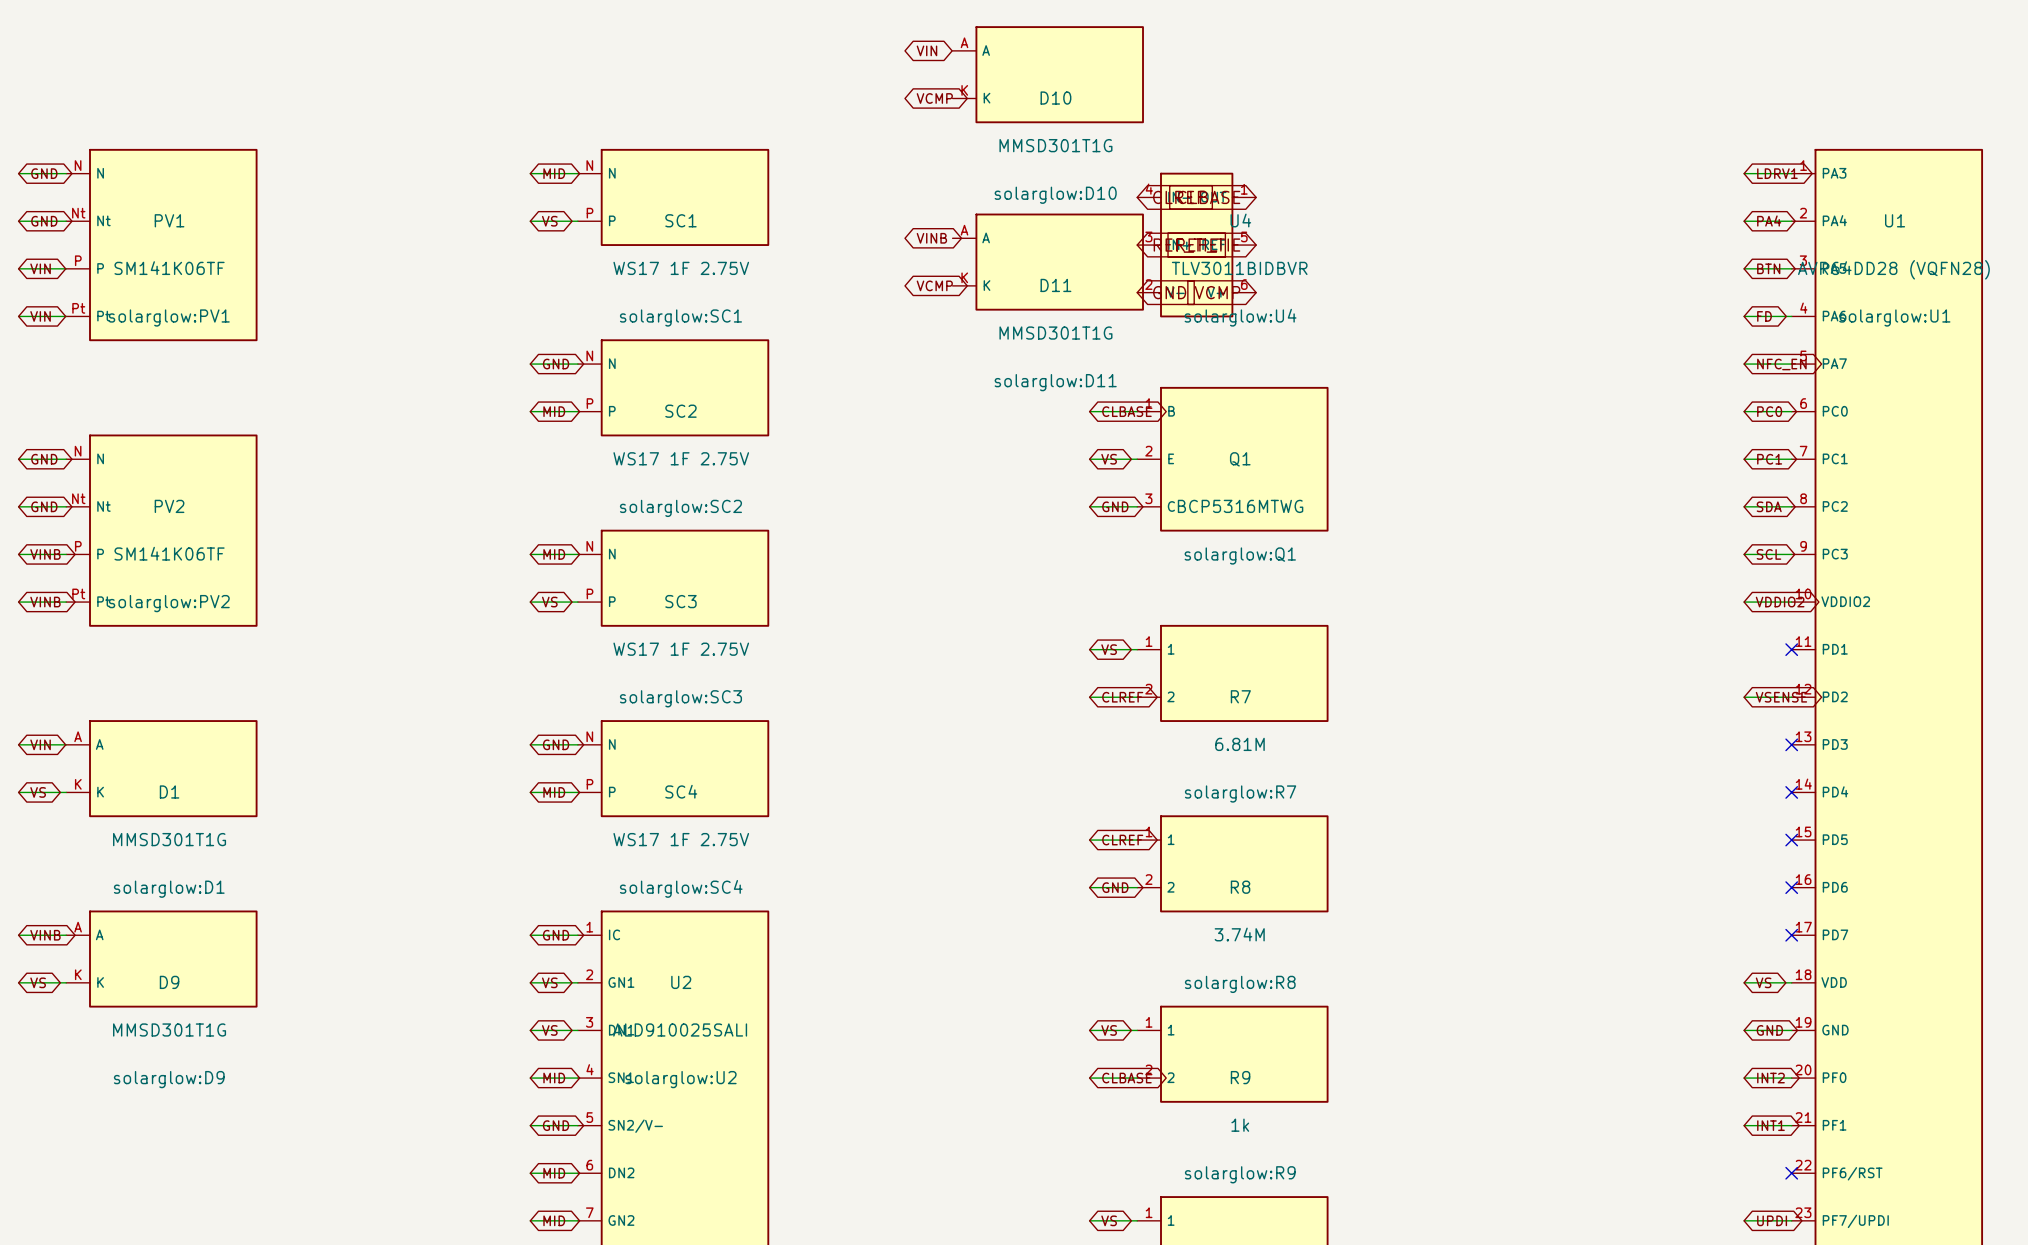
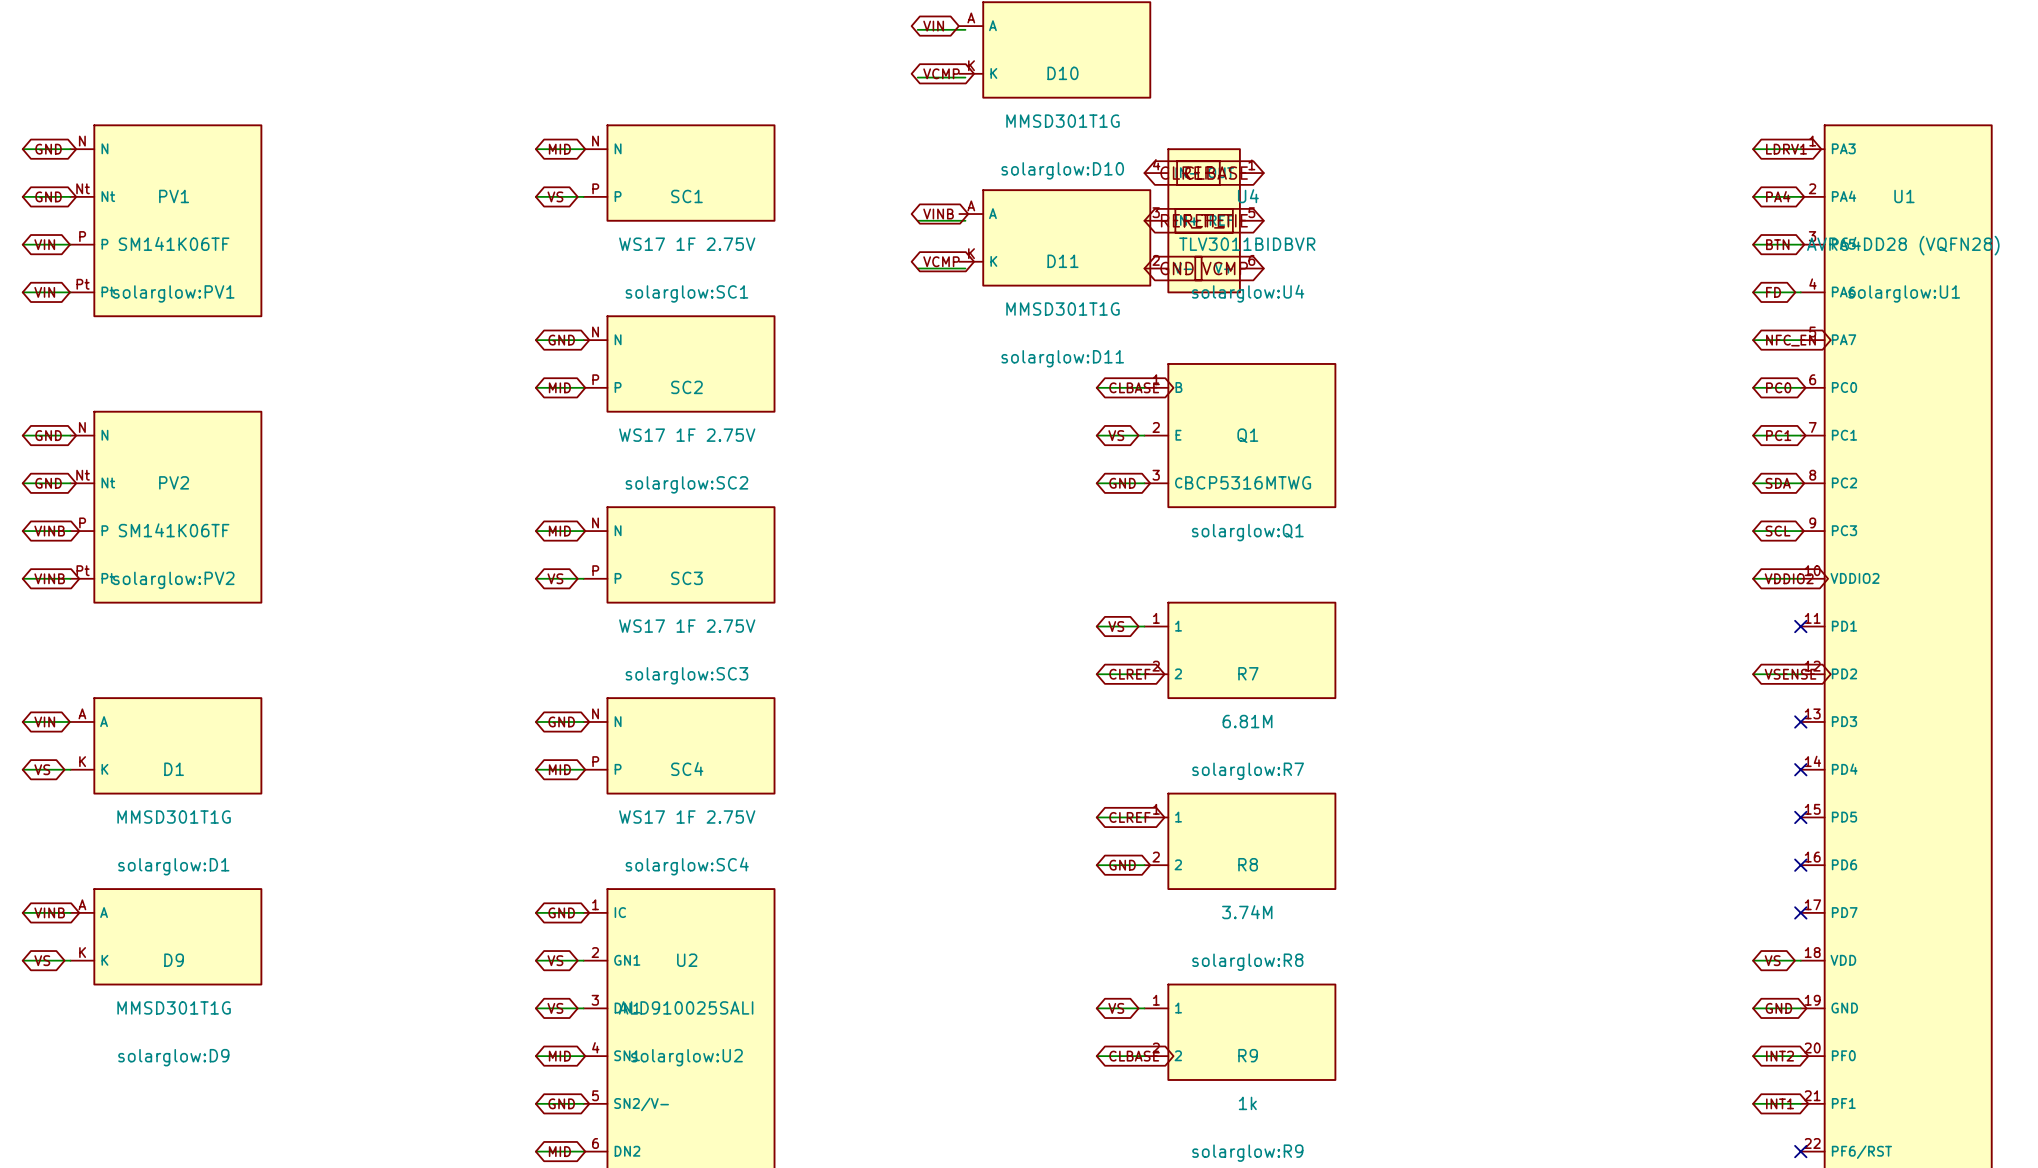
wire: none -> (917, 29) (965, 29)
wire: none -> (917, 77) (965, 77)
wire: none -> (917, 220) (965, 220)
wire: none -> (917, 268) (965, 268)

